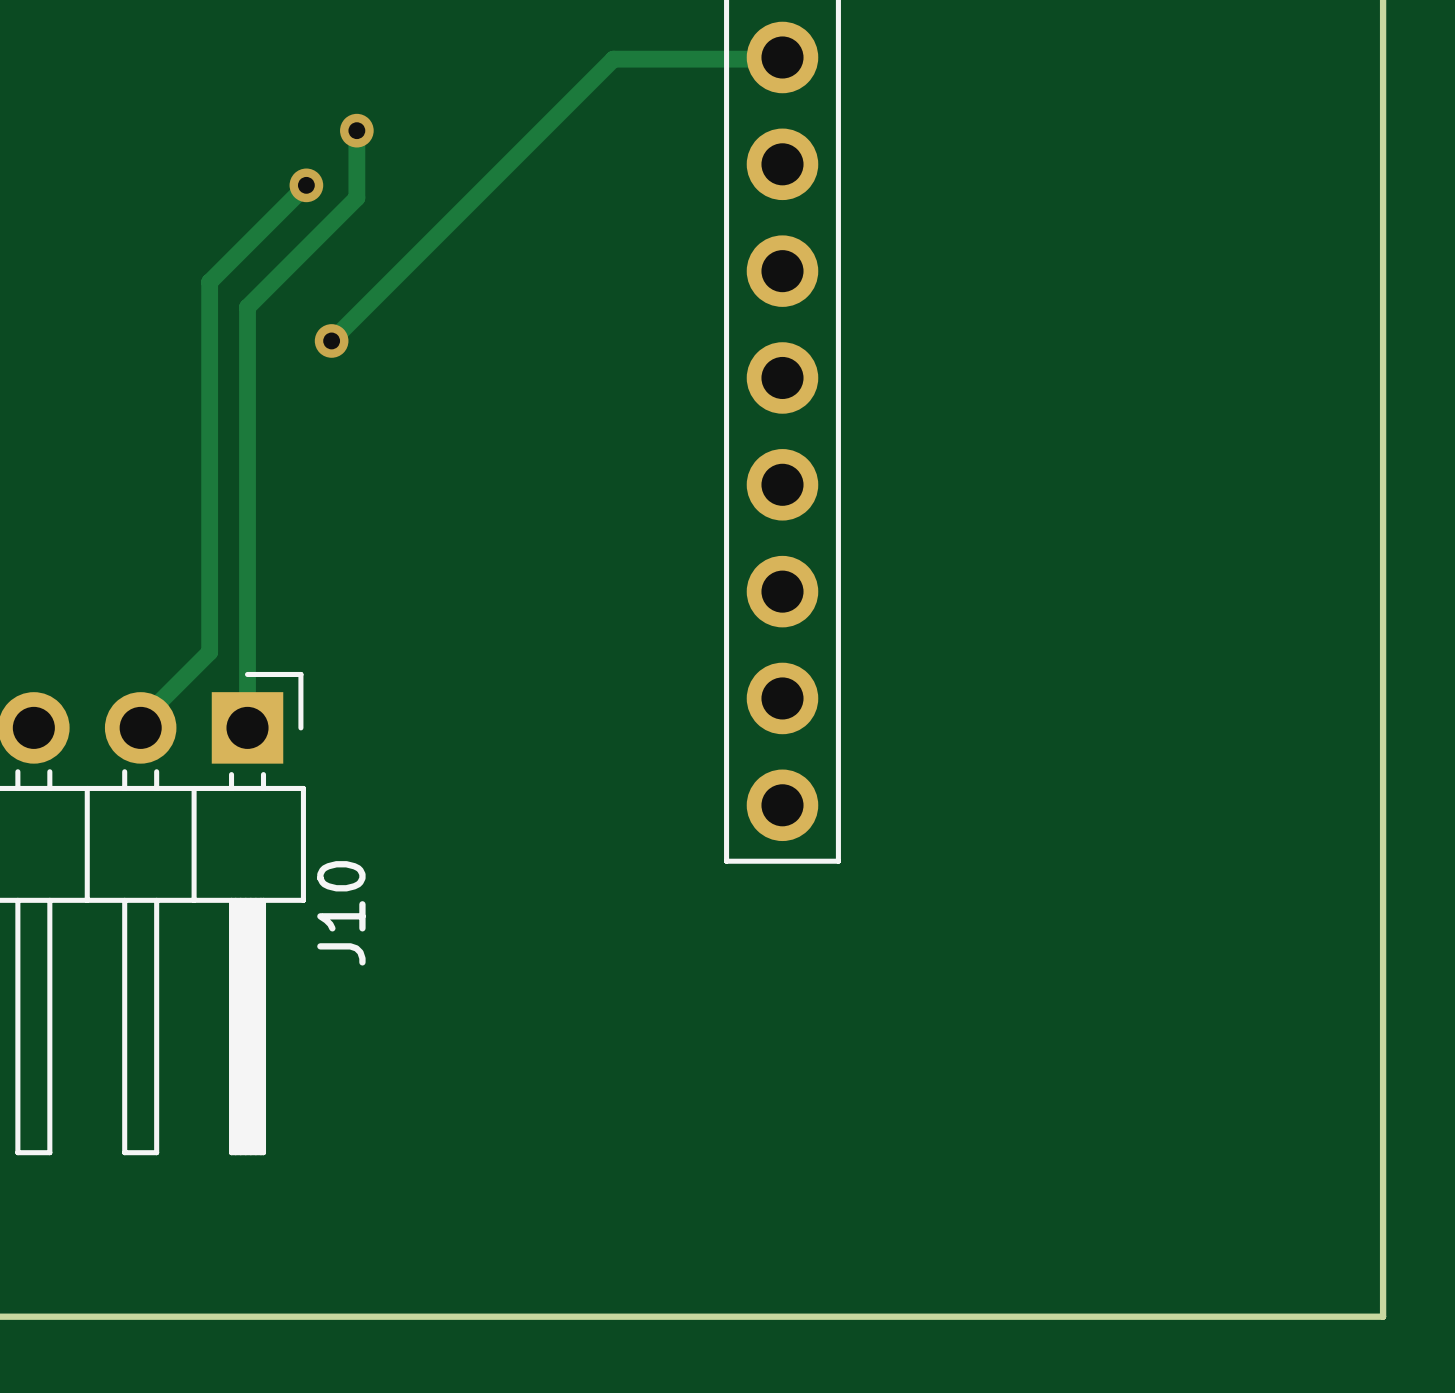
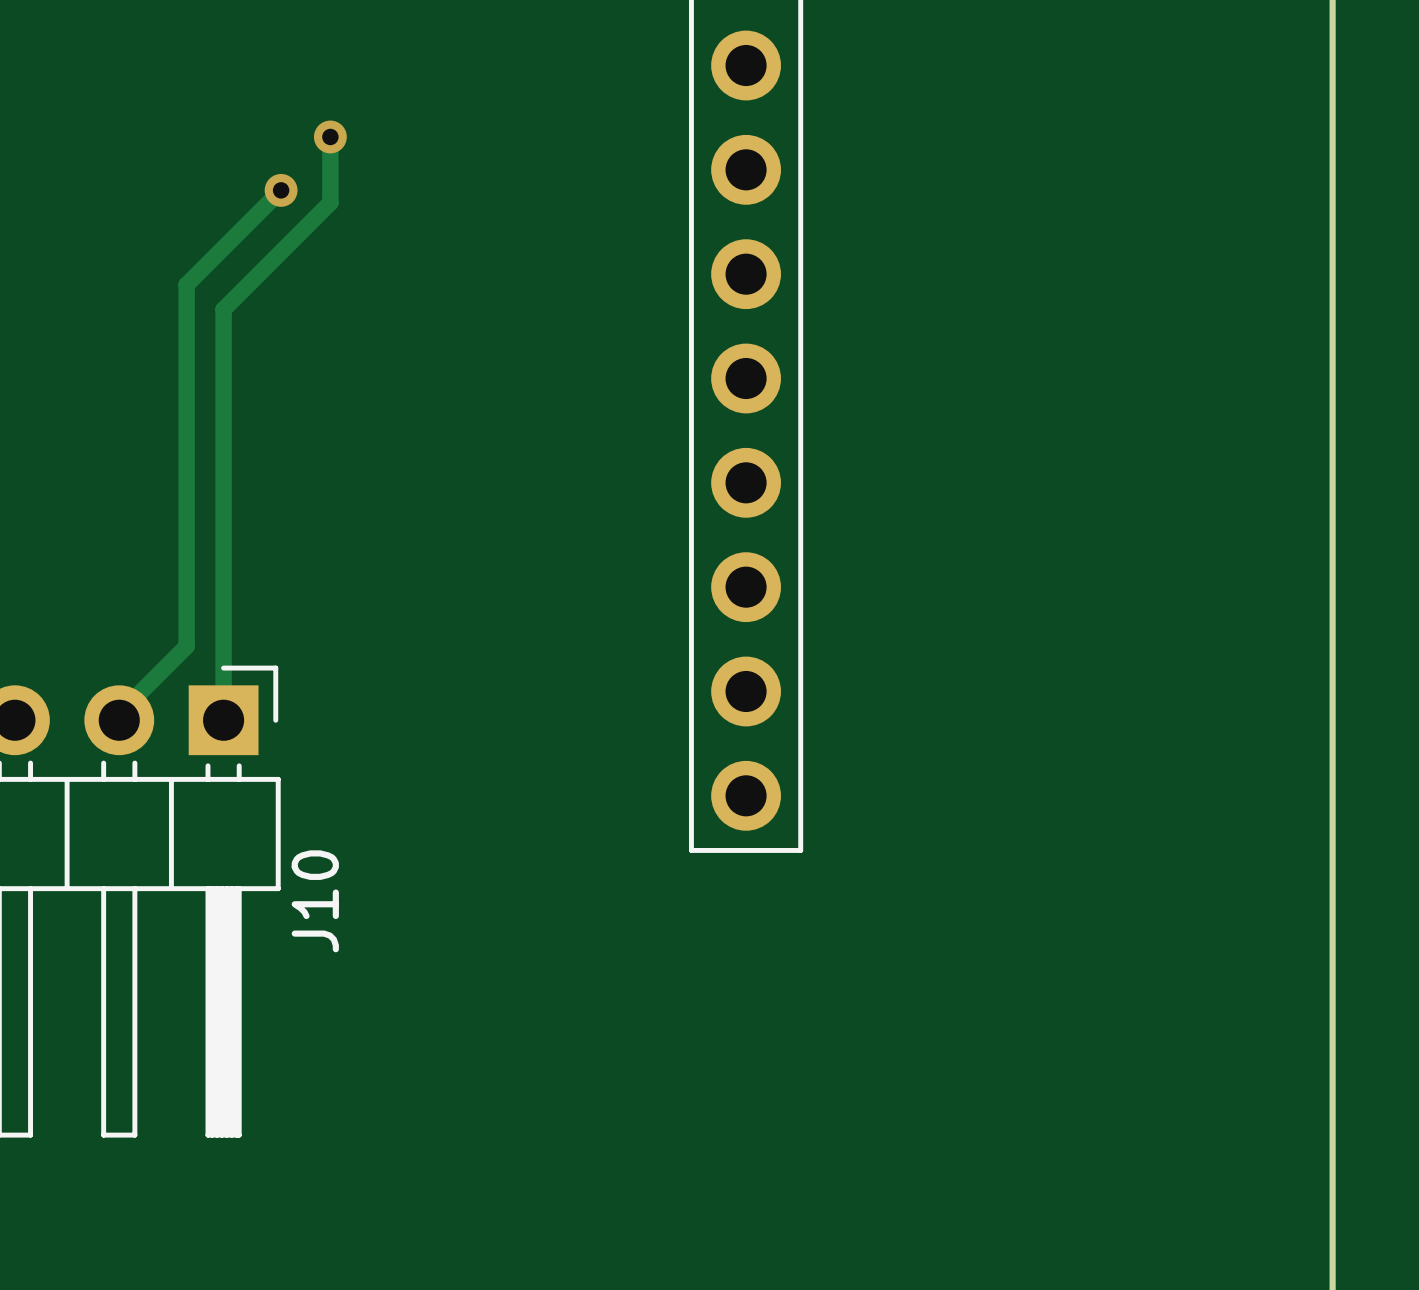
track: (782, 57) (781, 59) (613, 59) (331, 340) -> none
via: (331, 340) -> none

